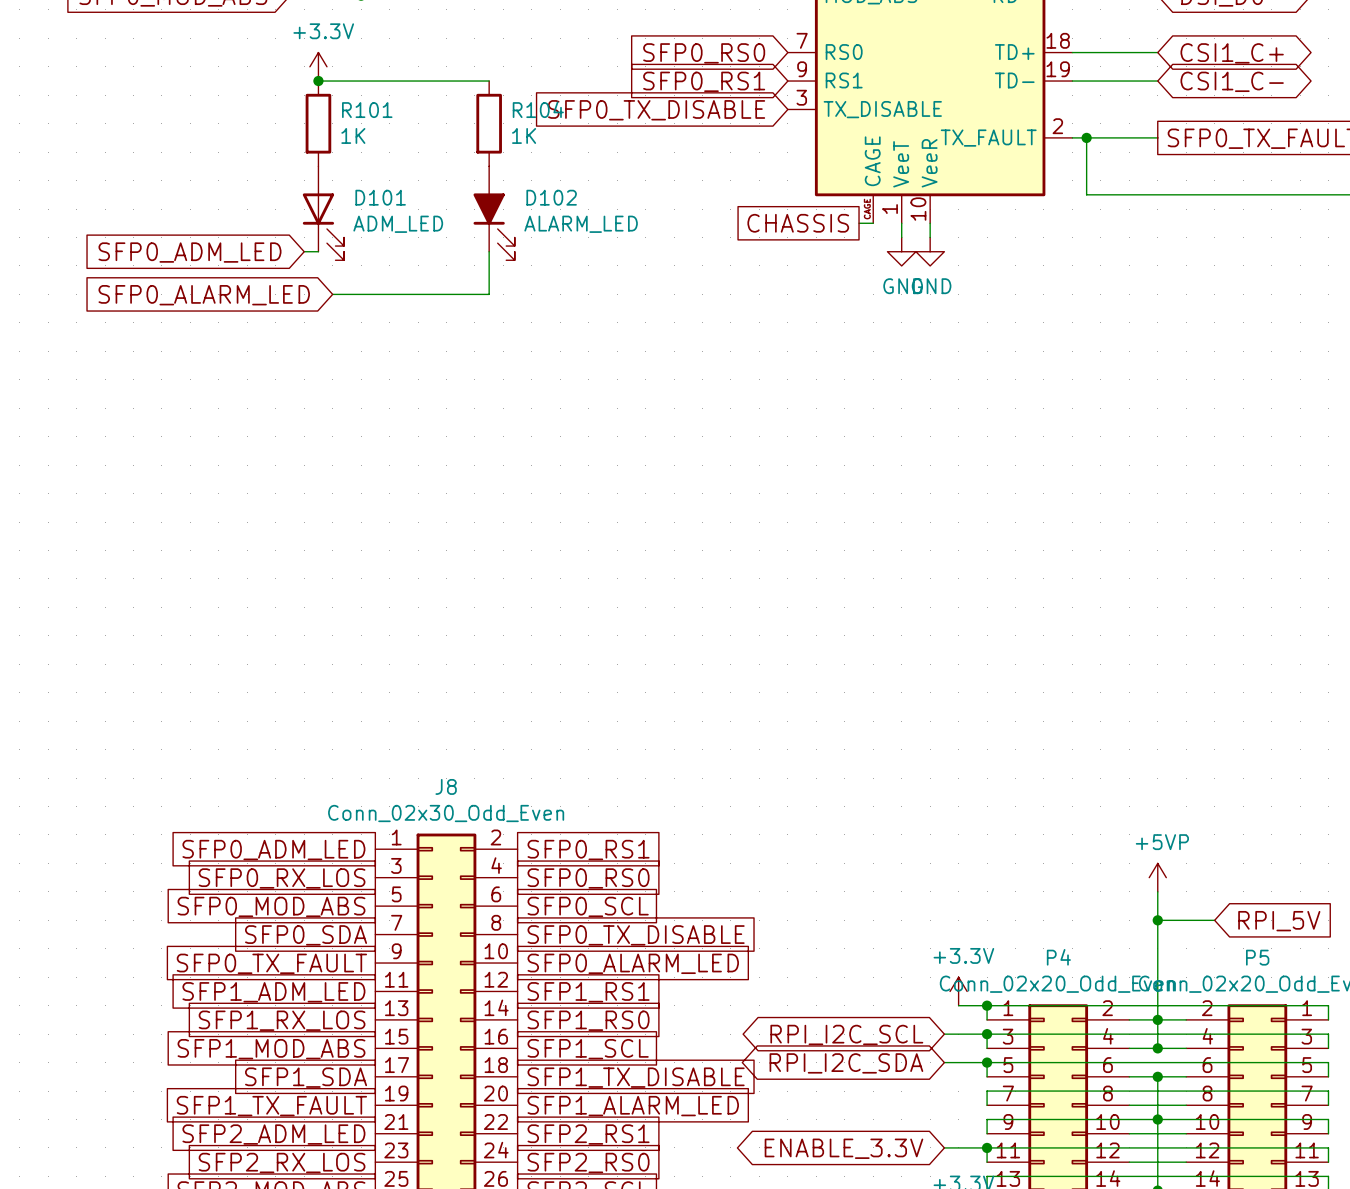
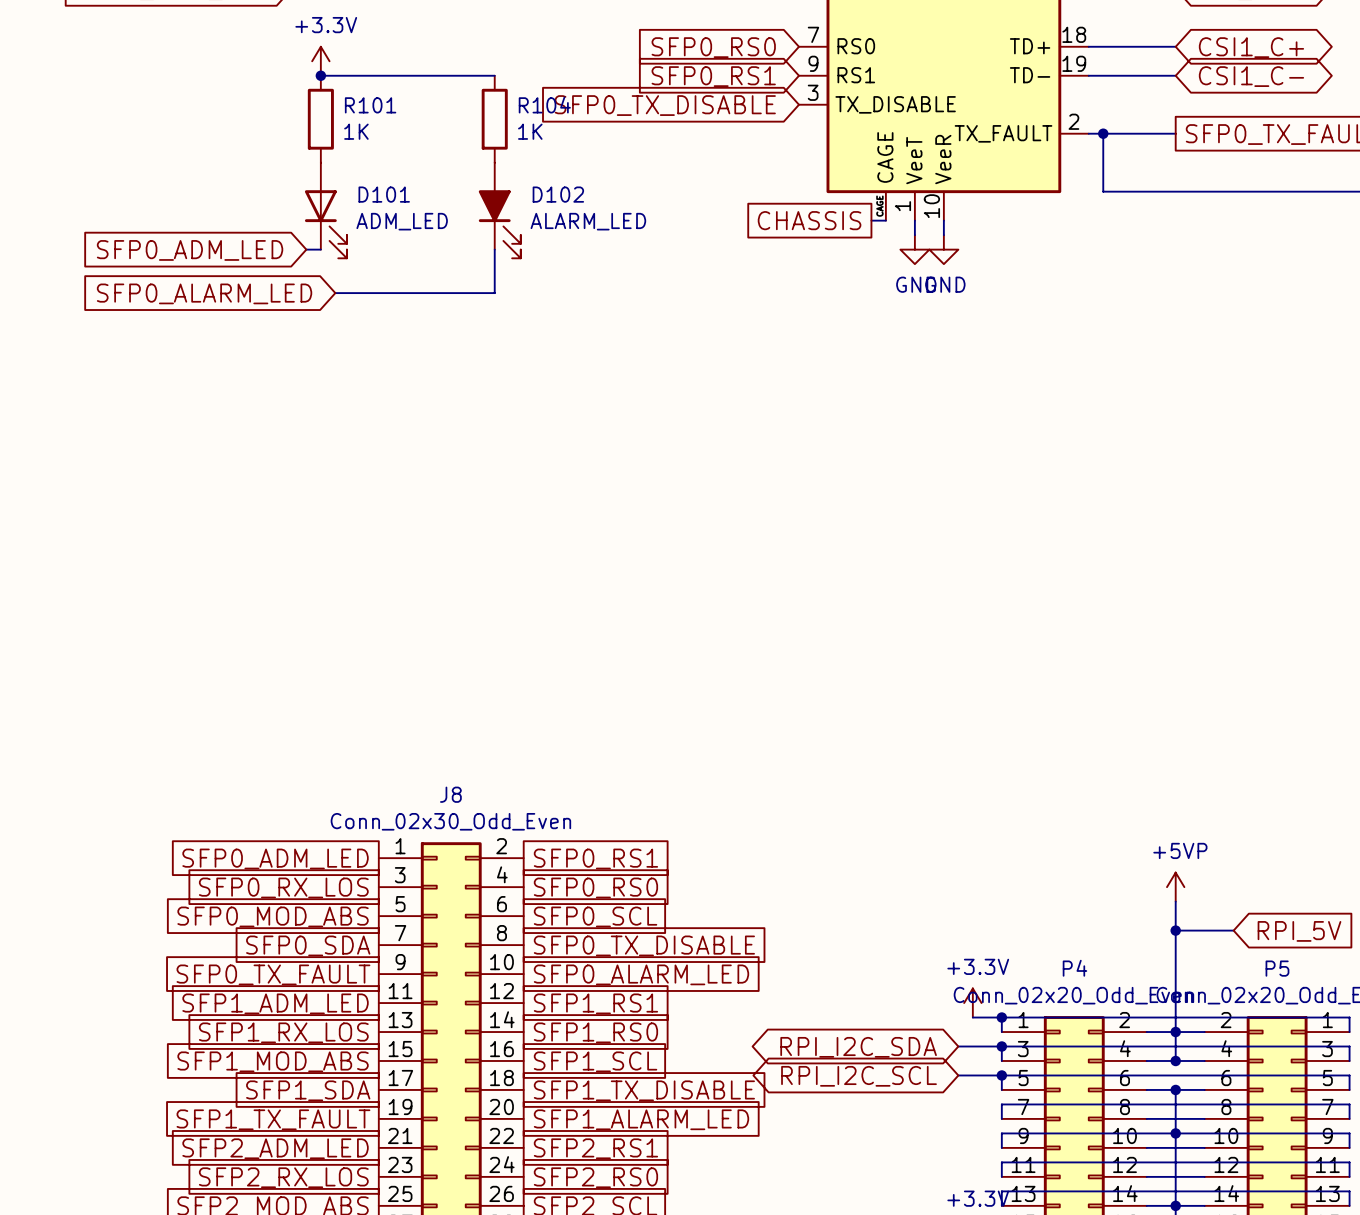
global label: RPI_I2C_SCL (846, 1034) -> RPI_I2C_SDA (858, 1047)
global label: RPI_I2C_SDA (846, 1063) -> RPI_I2C_SCL (859, 1076)
wire: (944, 1147) (987, 1147) -> none
junction: (987, 1147) -> none
global label: ENABLE_3.3V (843, 1148) -> none

